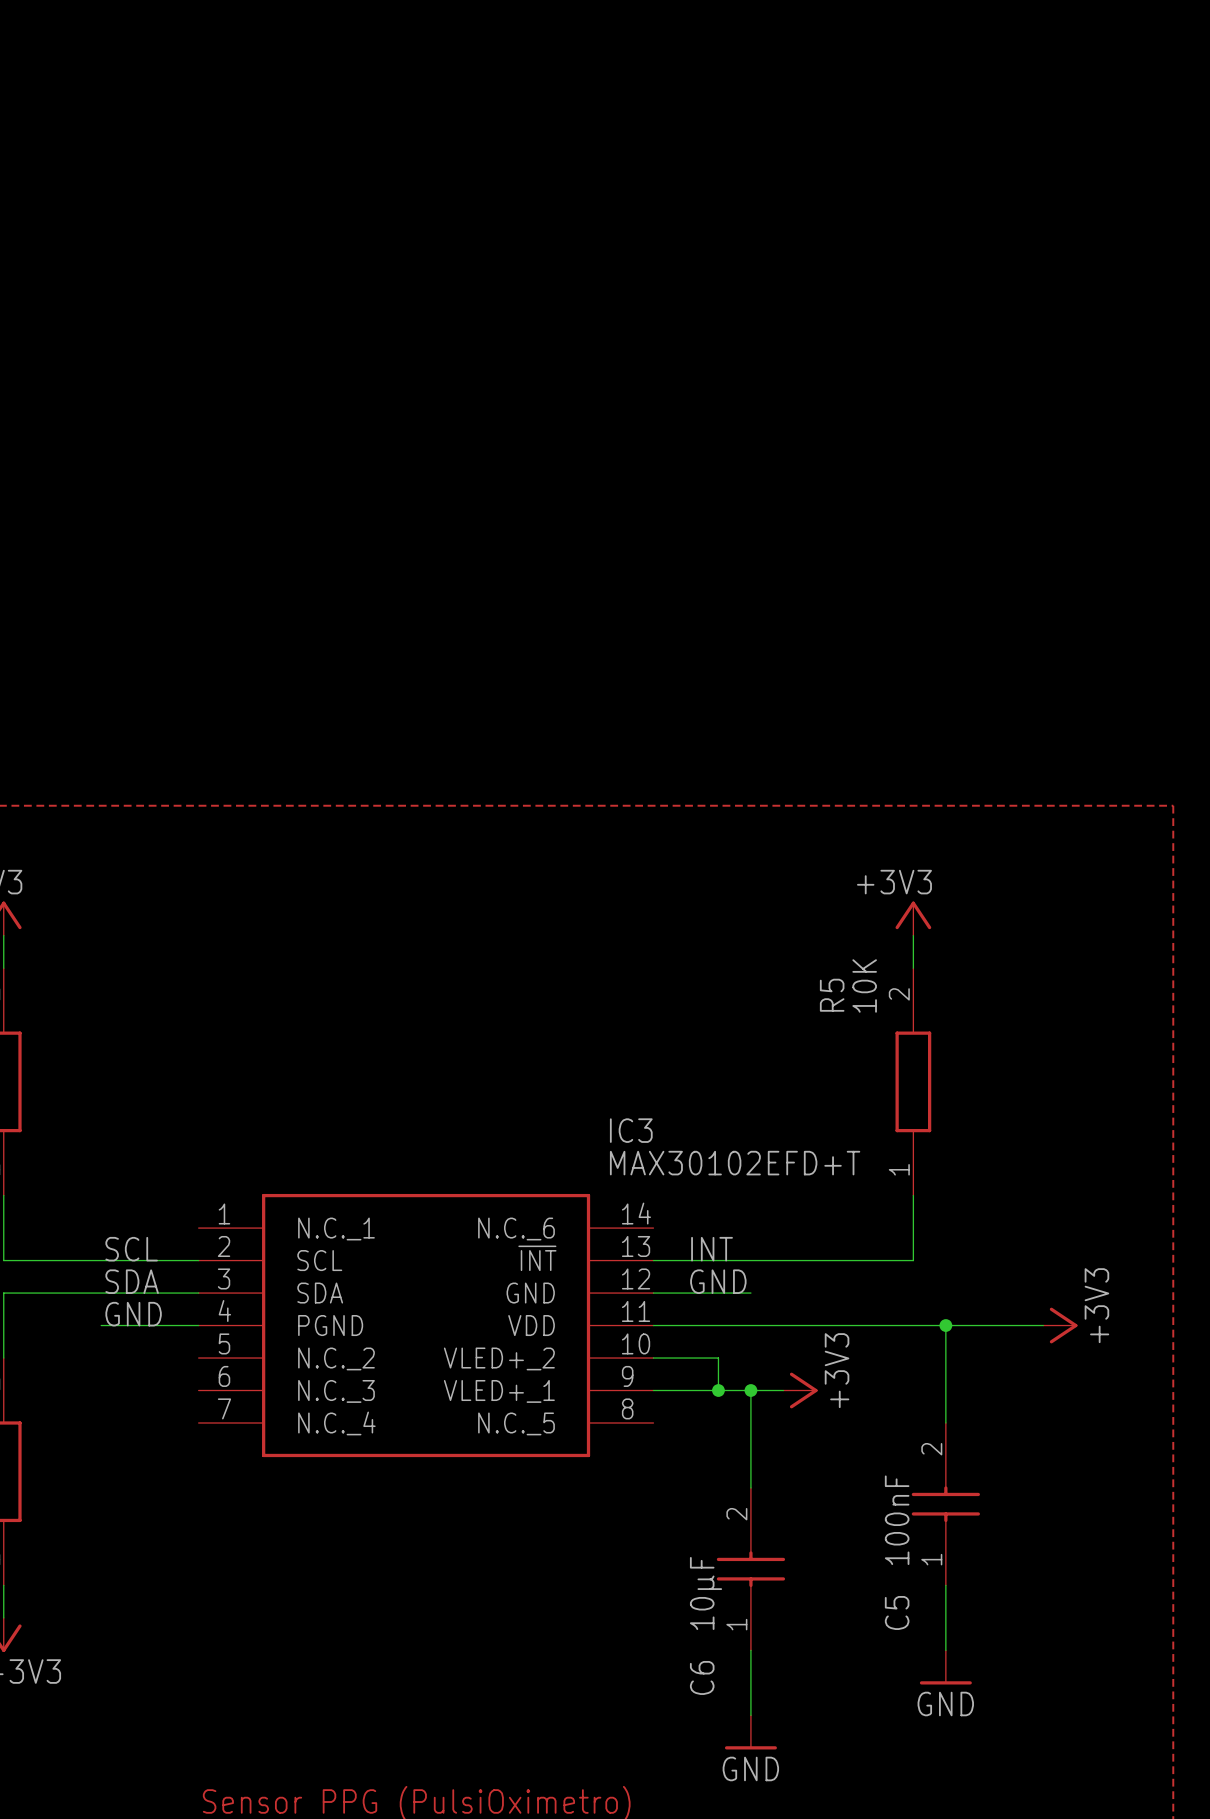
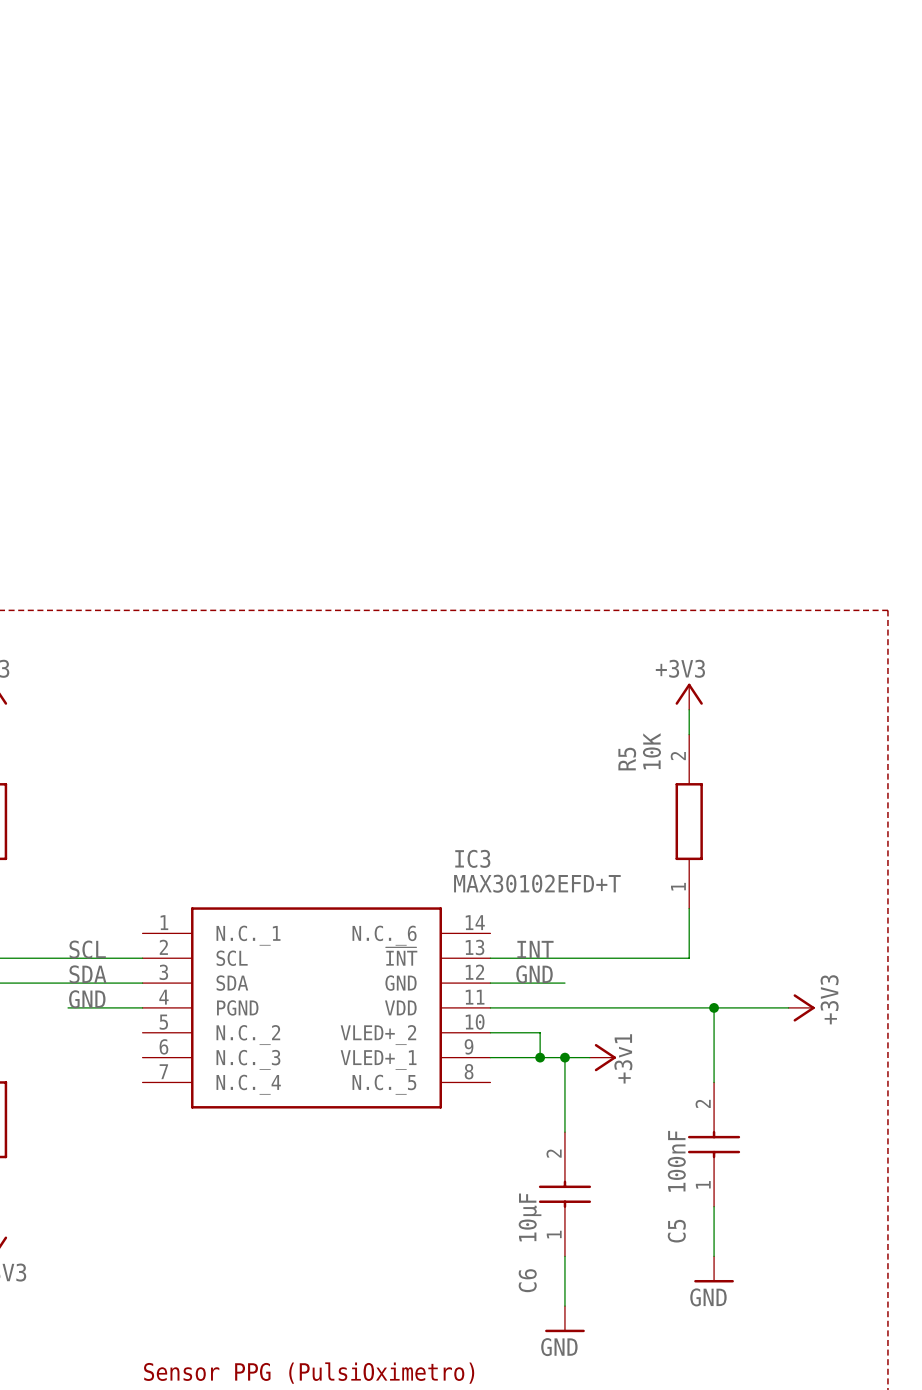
power symbol text: +3V3 (837, 1370) -> none
power symbol text: none -> +3v1 (623, 1058)

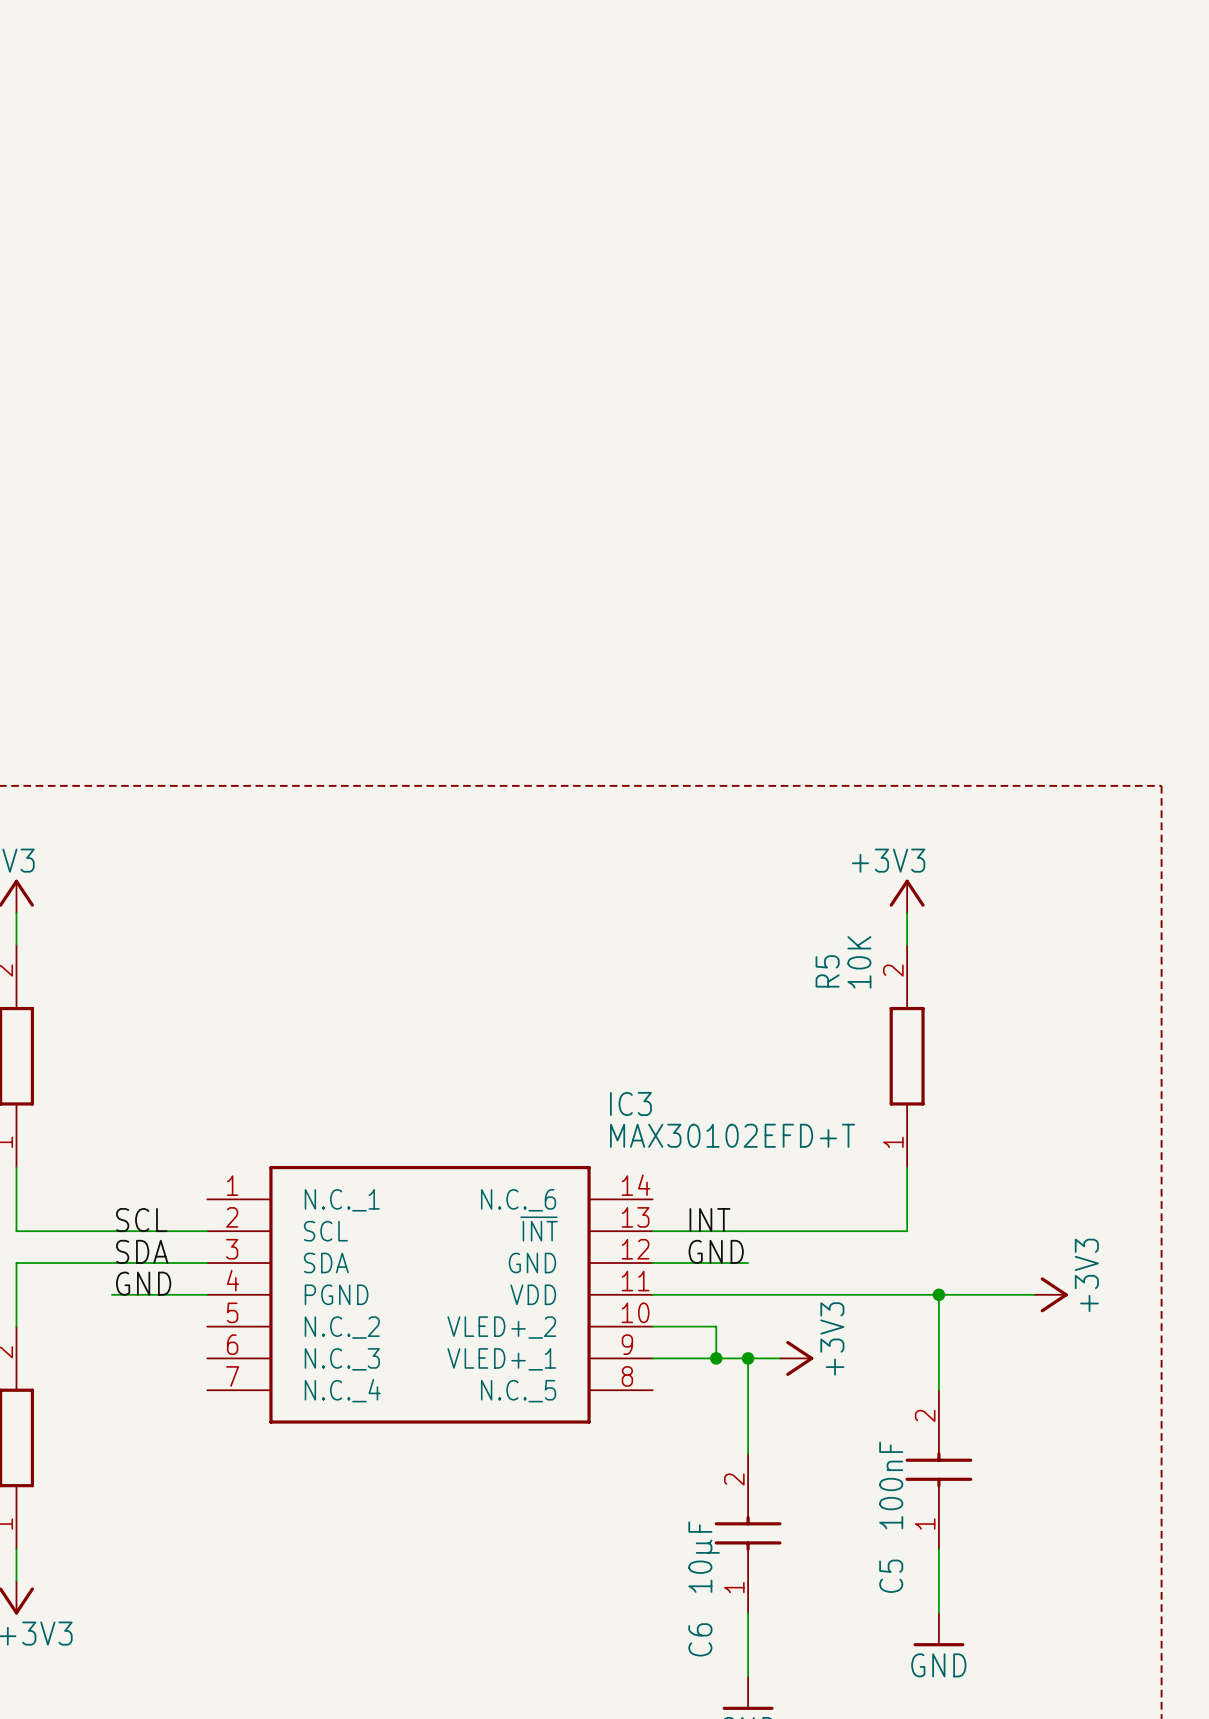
power symbol text: none -> +3V3 (832, 1338)
power symbol text: +3v1 (623, 1058) -> none

